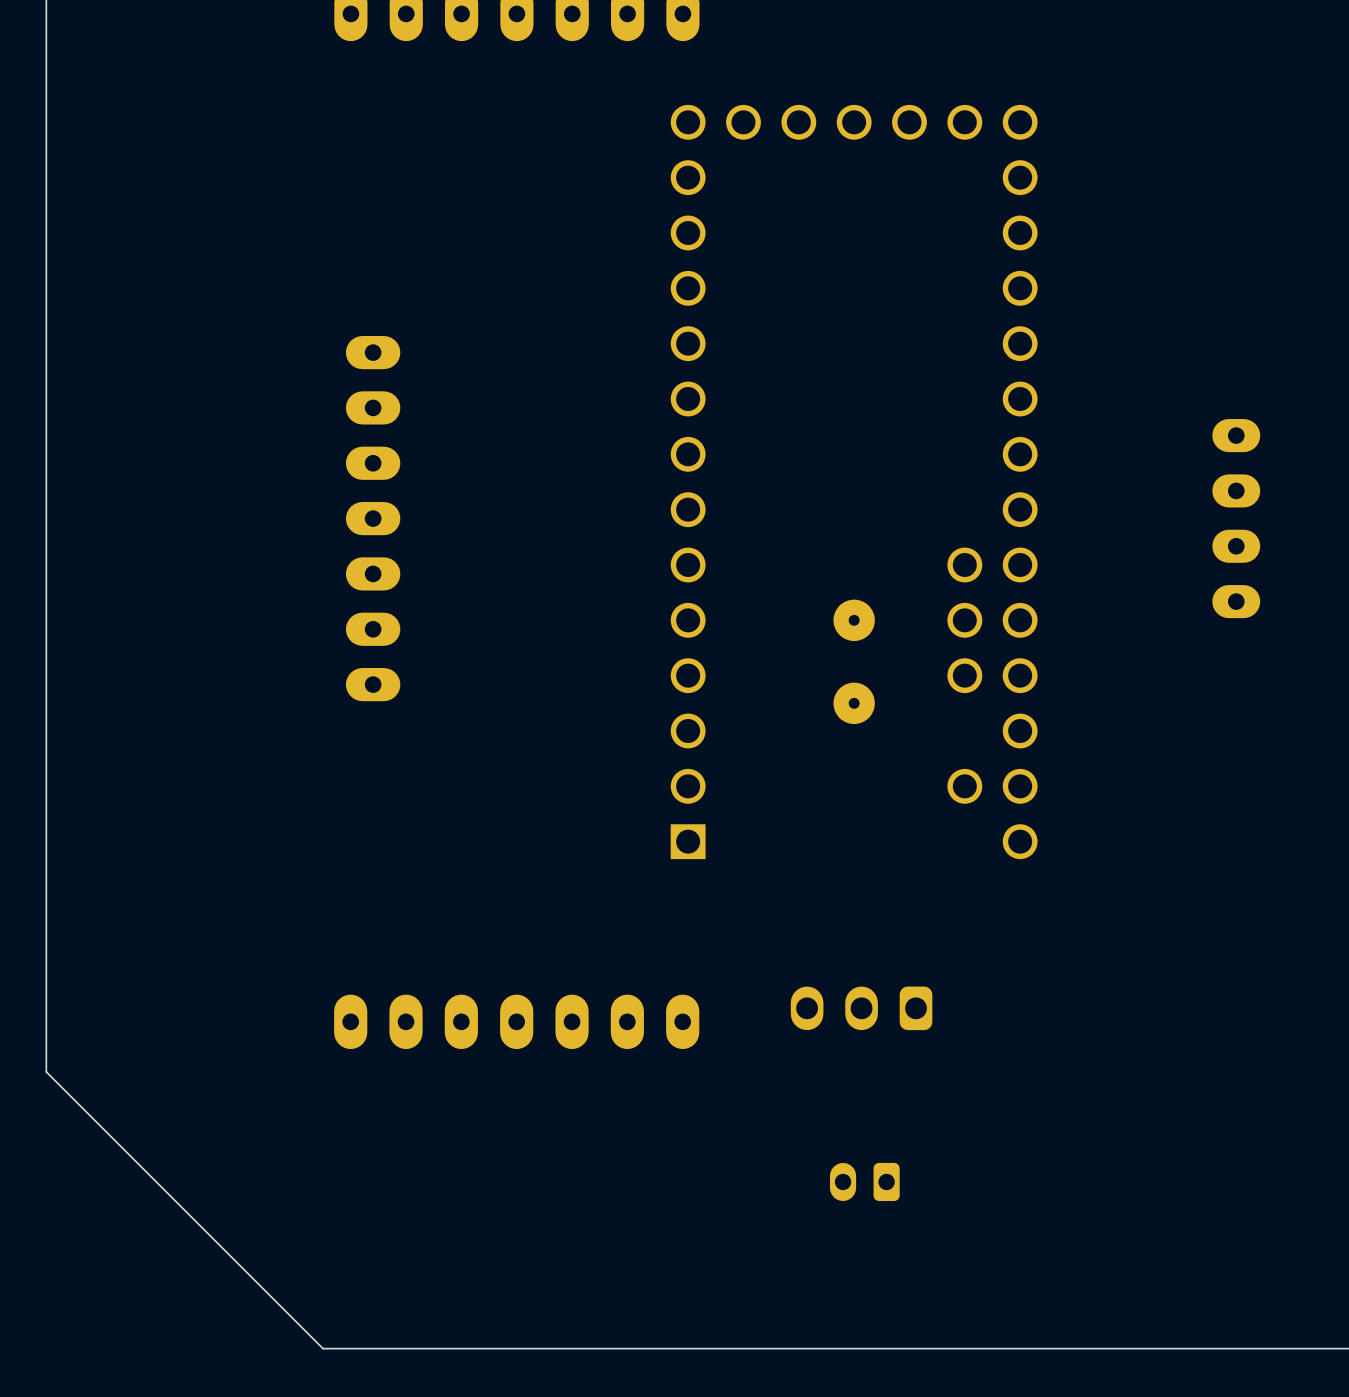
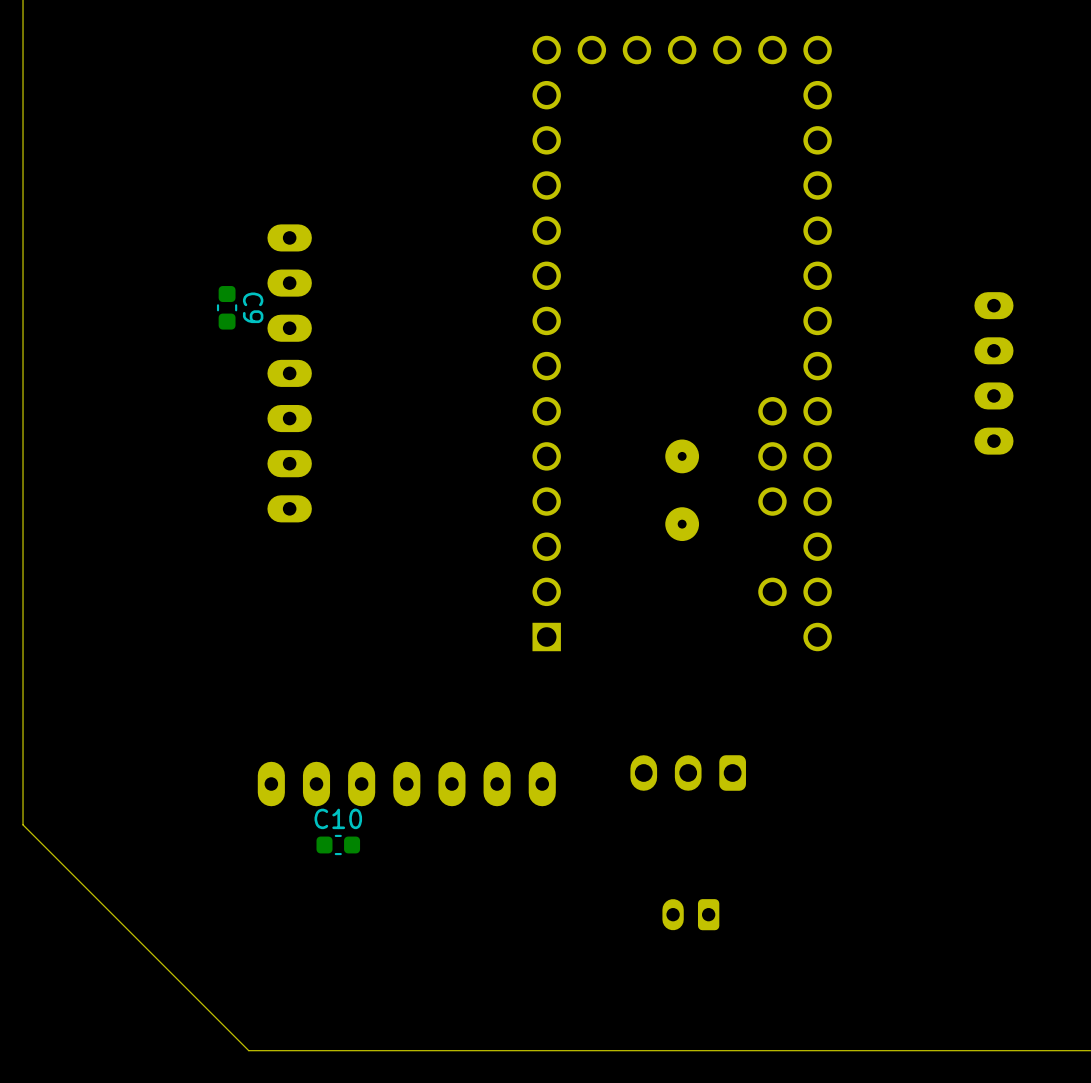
C9: none -> (227, 307)
C10: none -> (338, 844)

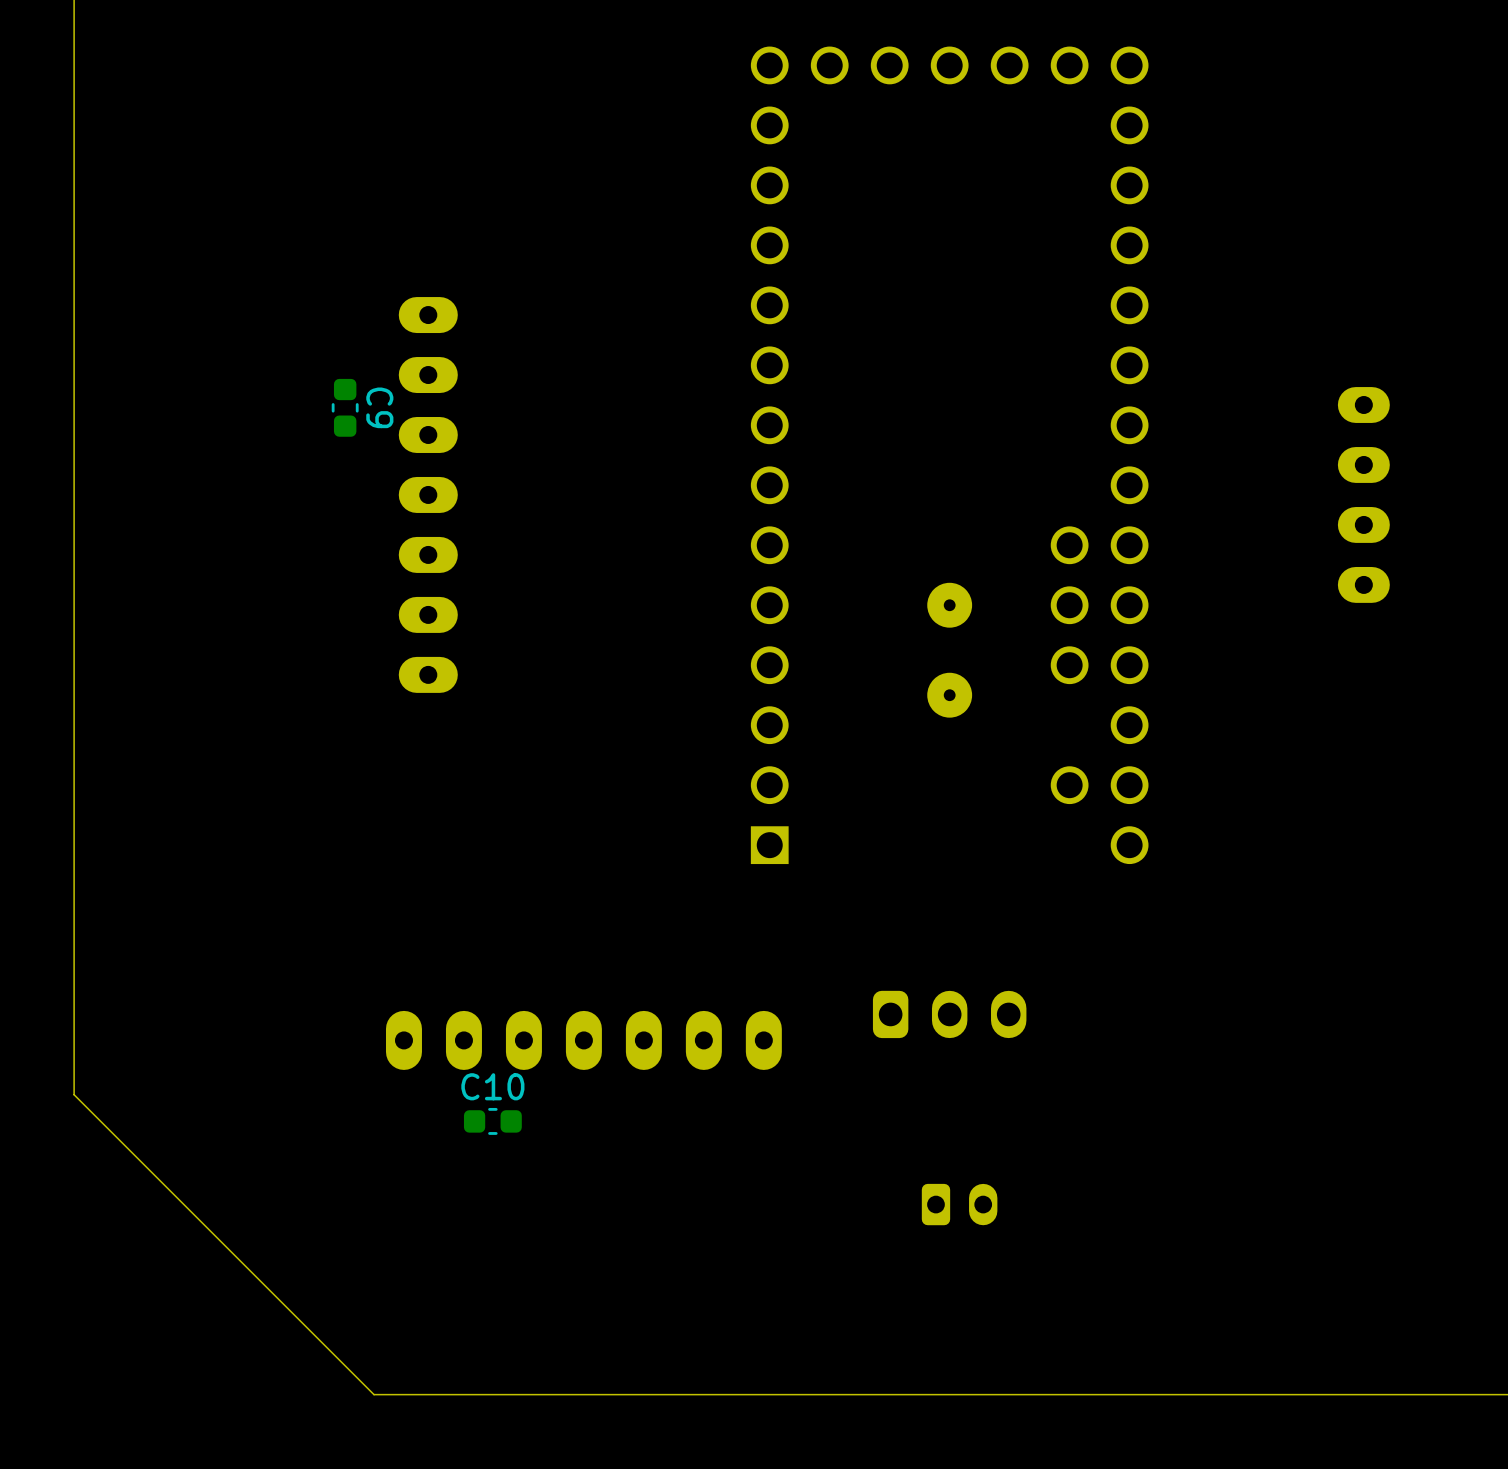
part rotation: 0° (688, 772) -> 180° (949, 1014)
part rotation: 0° (690, 914) -> 180° (959, 1204)

